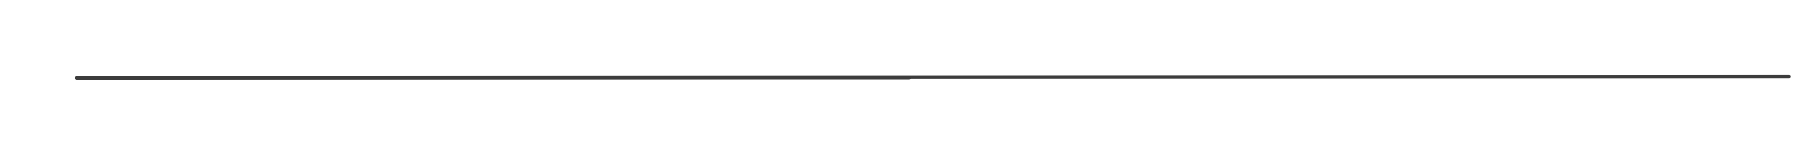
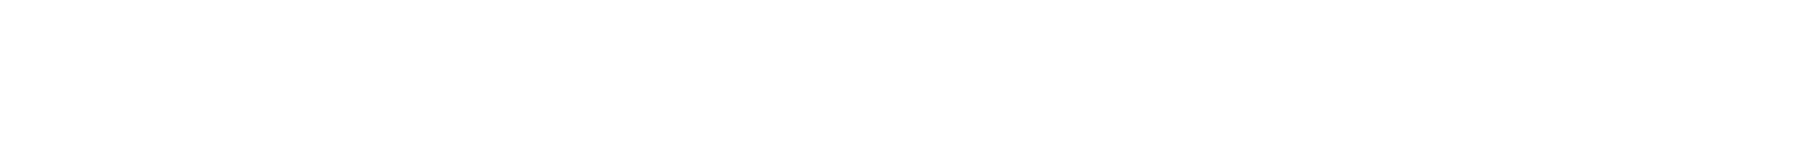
line: (1789, 76) (76, 77) (909, 77) -> none

